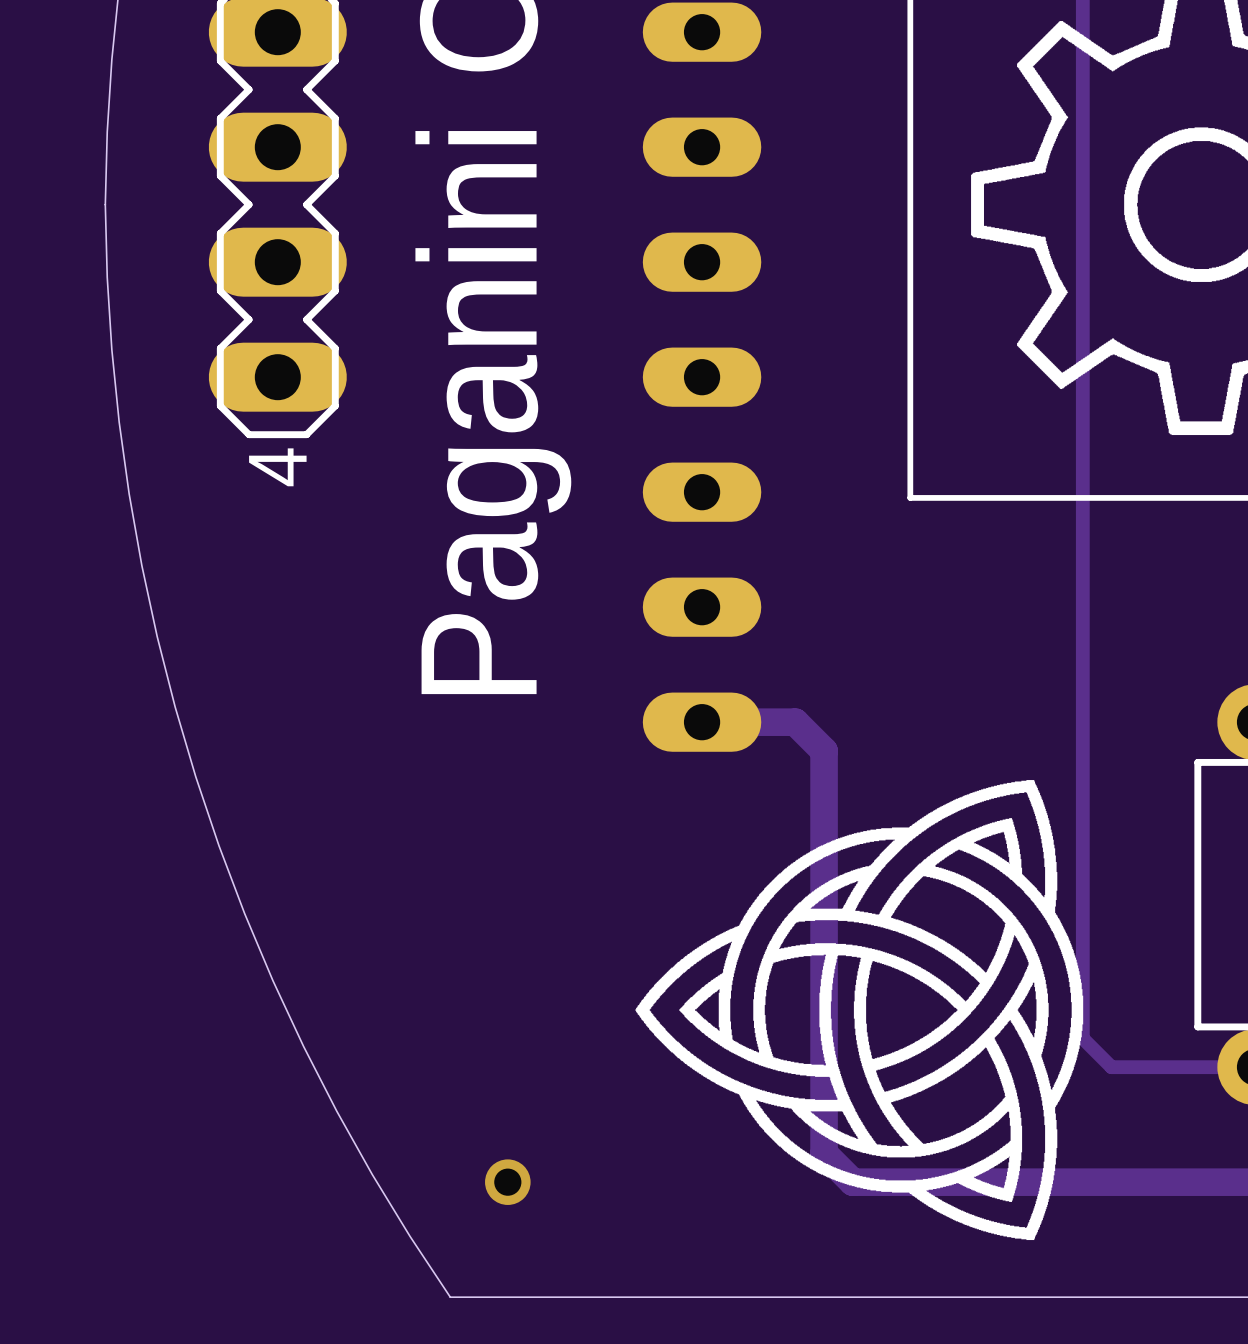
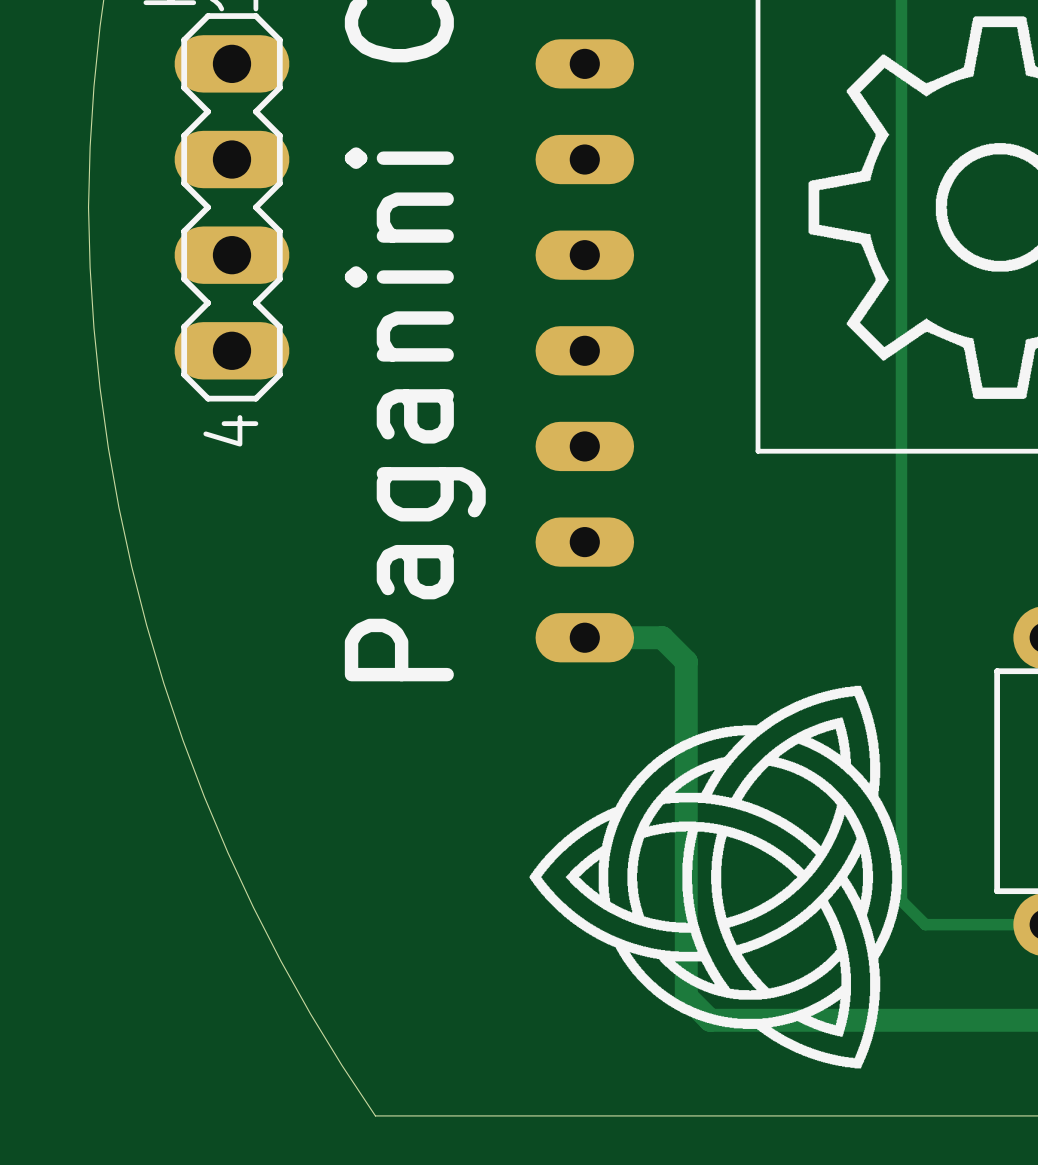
via: (507, 1182) -> none

